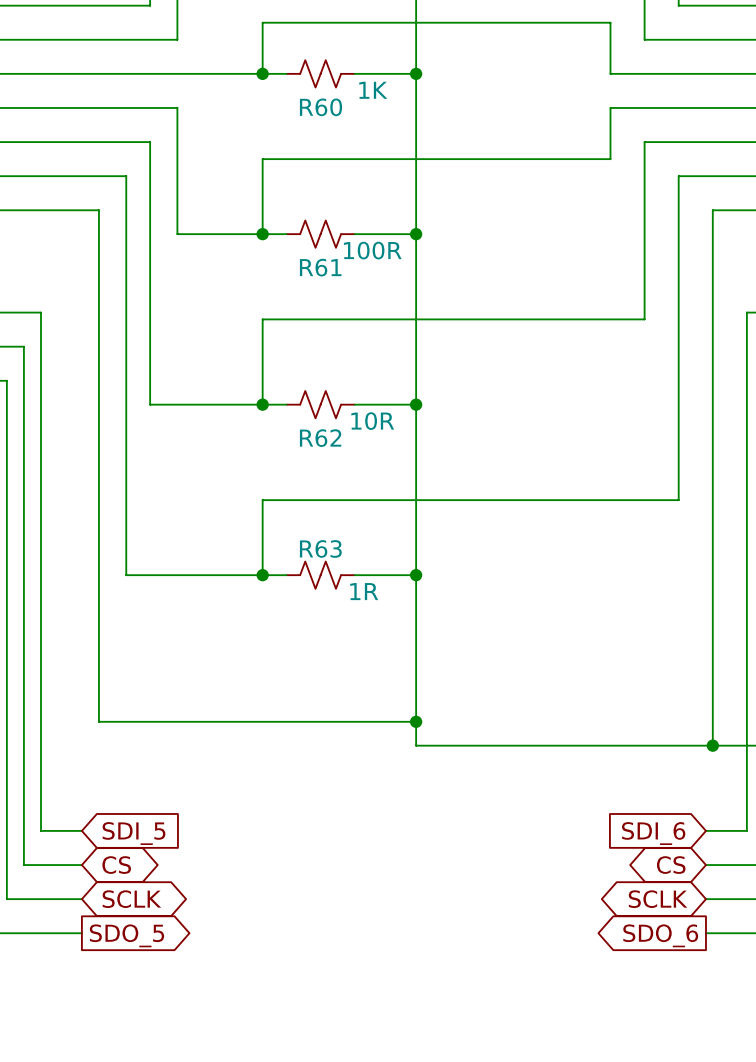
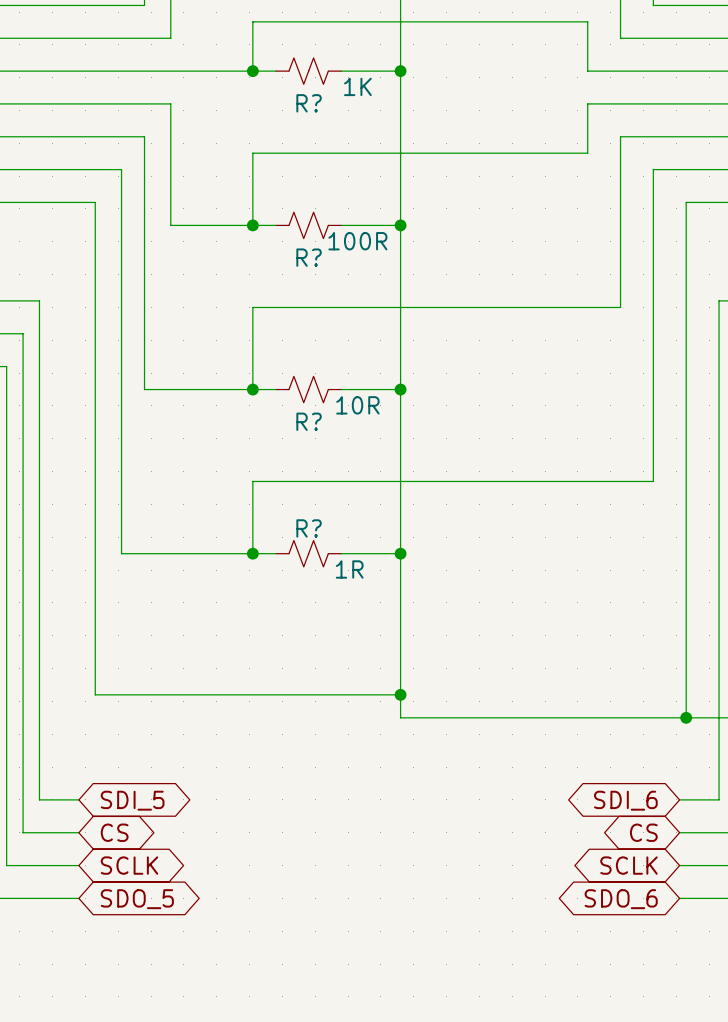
R60 name: R60 (321, 107) -> R? (309, 103)
R61 name: R61 (320, 267) -> R? (309, 257)
R62 name: R62 (320, 438) -> R? (309, 421)
R63 name: R63 (320, 548) -> R? (309, 528)
global label shape: input (134, 833) -> bidirectional (132, 800)
global label shape: input (653, 833) -> bidirectional (625, 800)
global label shape: output (126, 935) -> bidirectional (137, 899)
global label shape: output (660, 935) -> bidirectional (621, 899)

